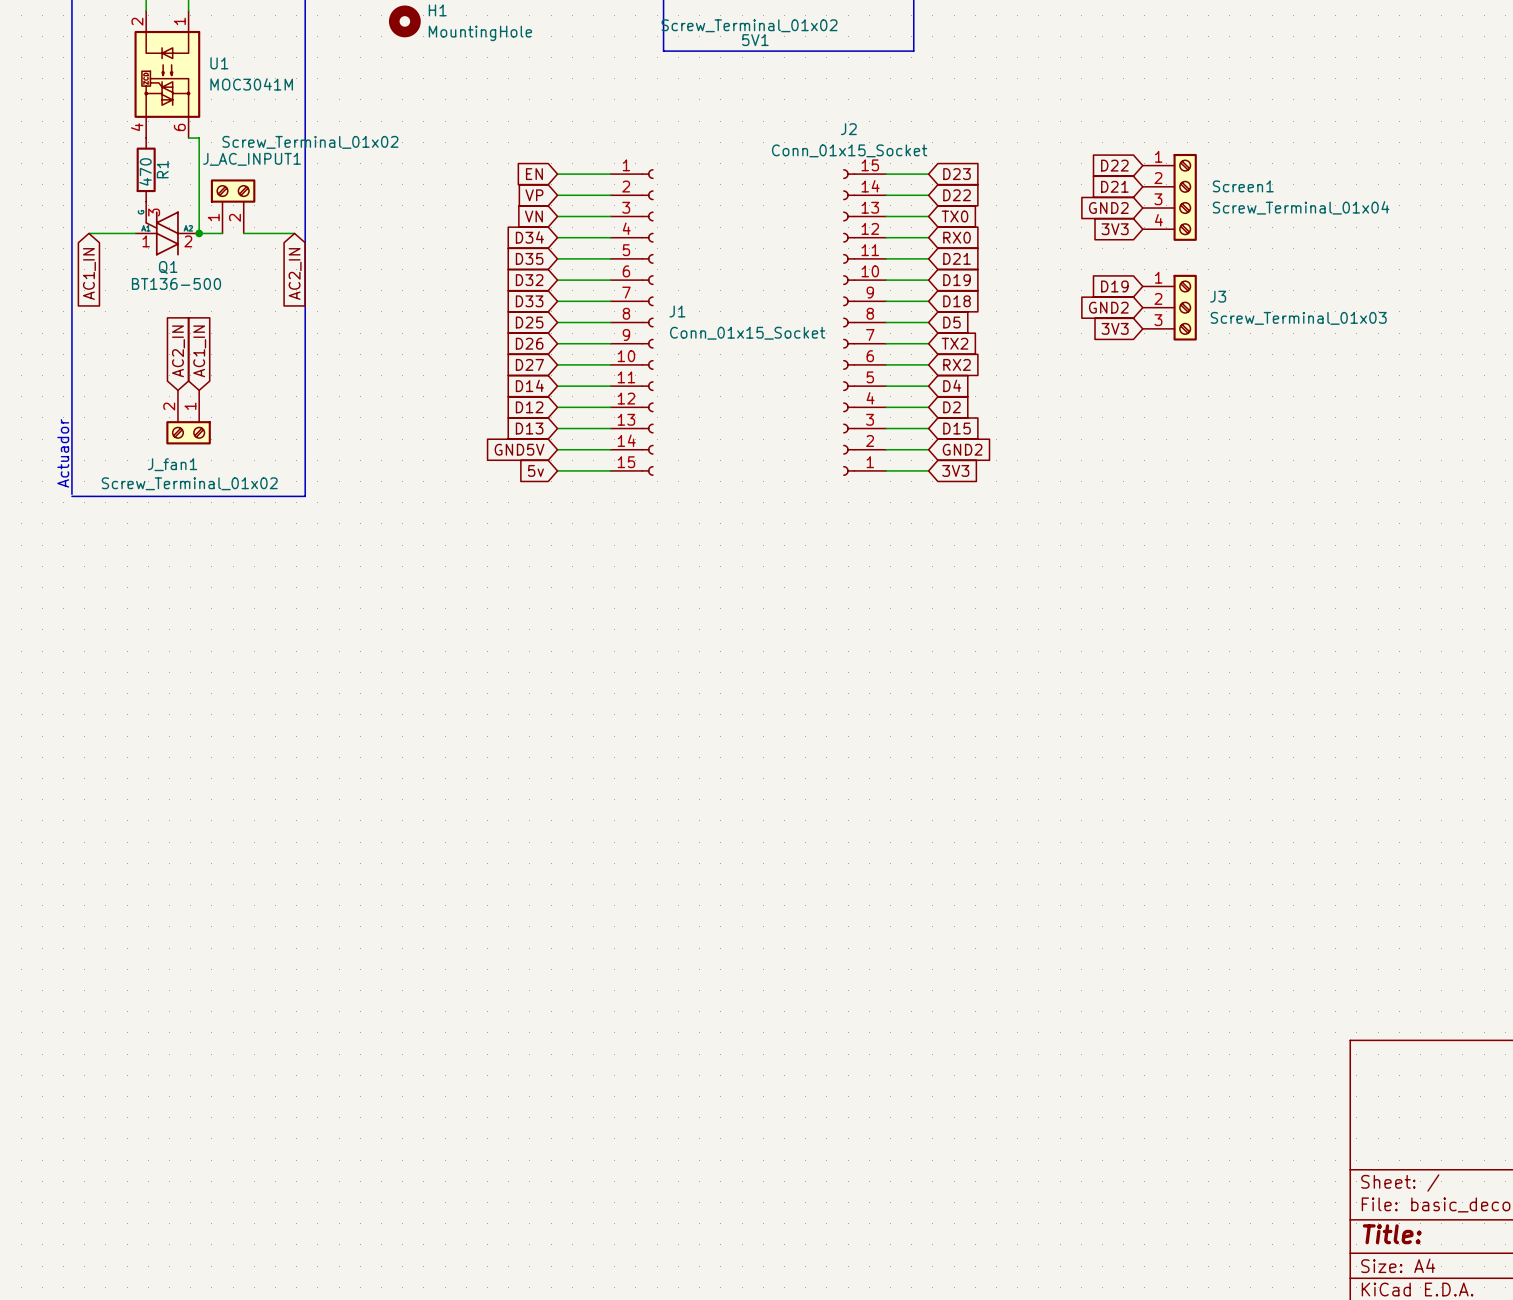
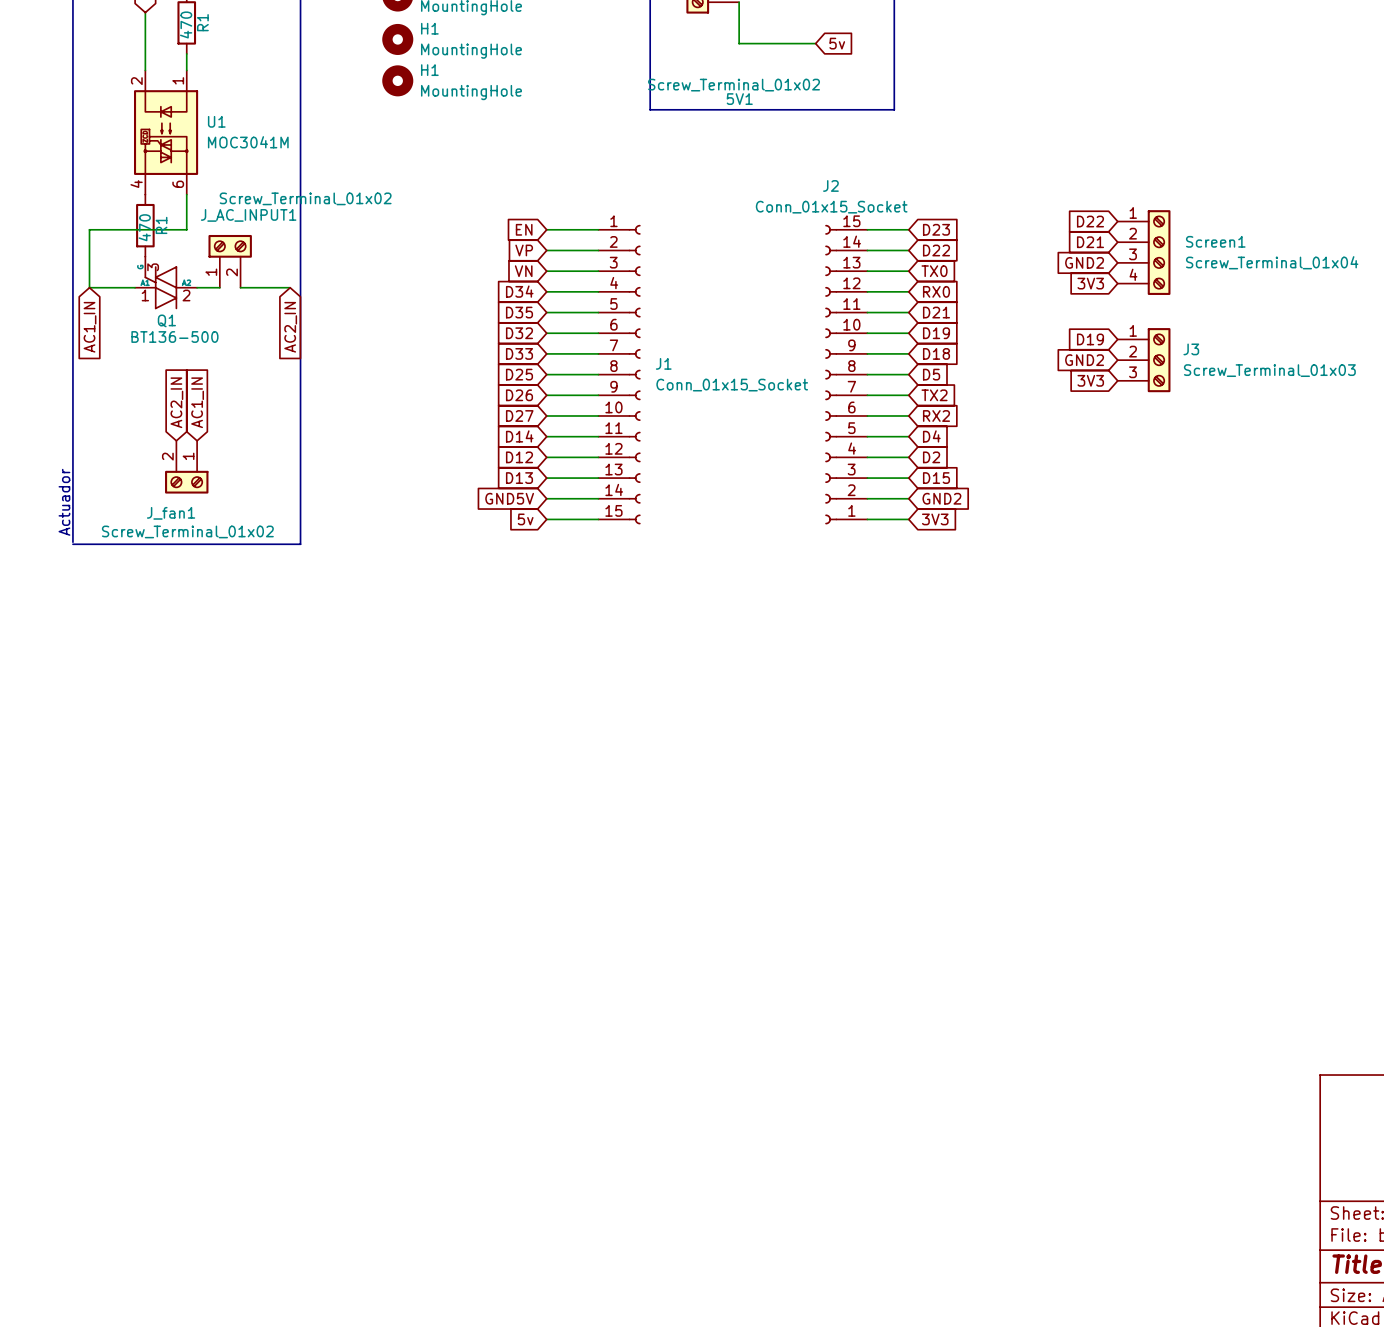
wire: (188, 138) (199, 138) (199, 233) -> (186, 194) (186, 229) (89, 229) (89, 287)
junction: (199, 233) -> none

